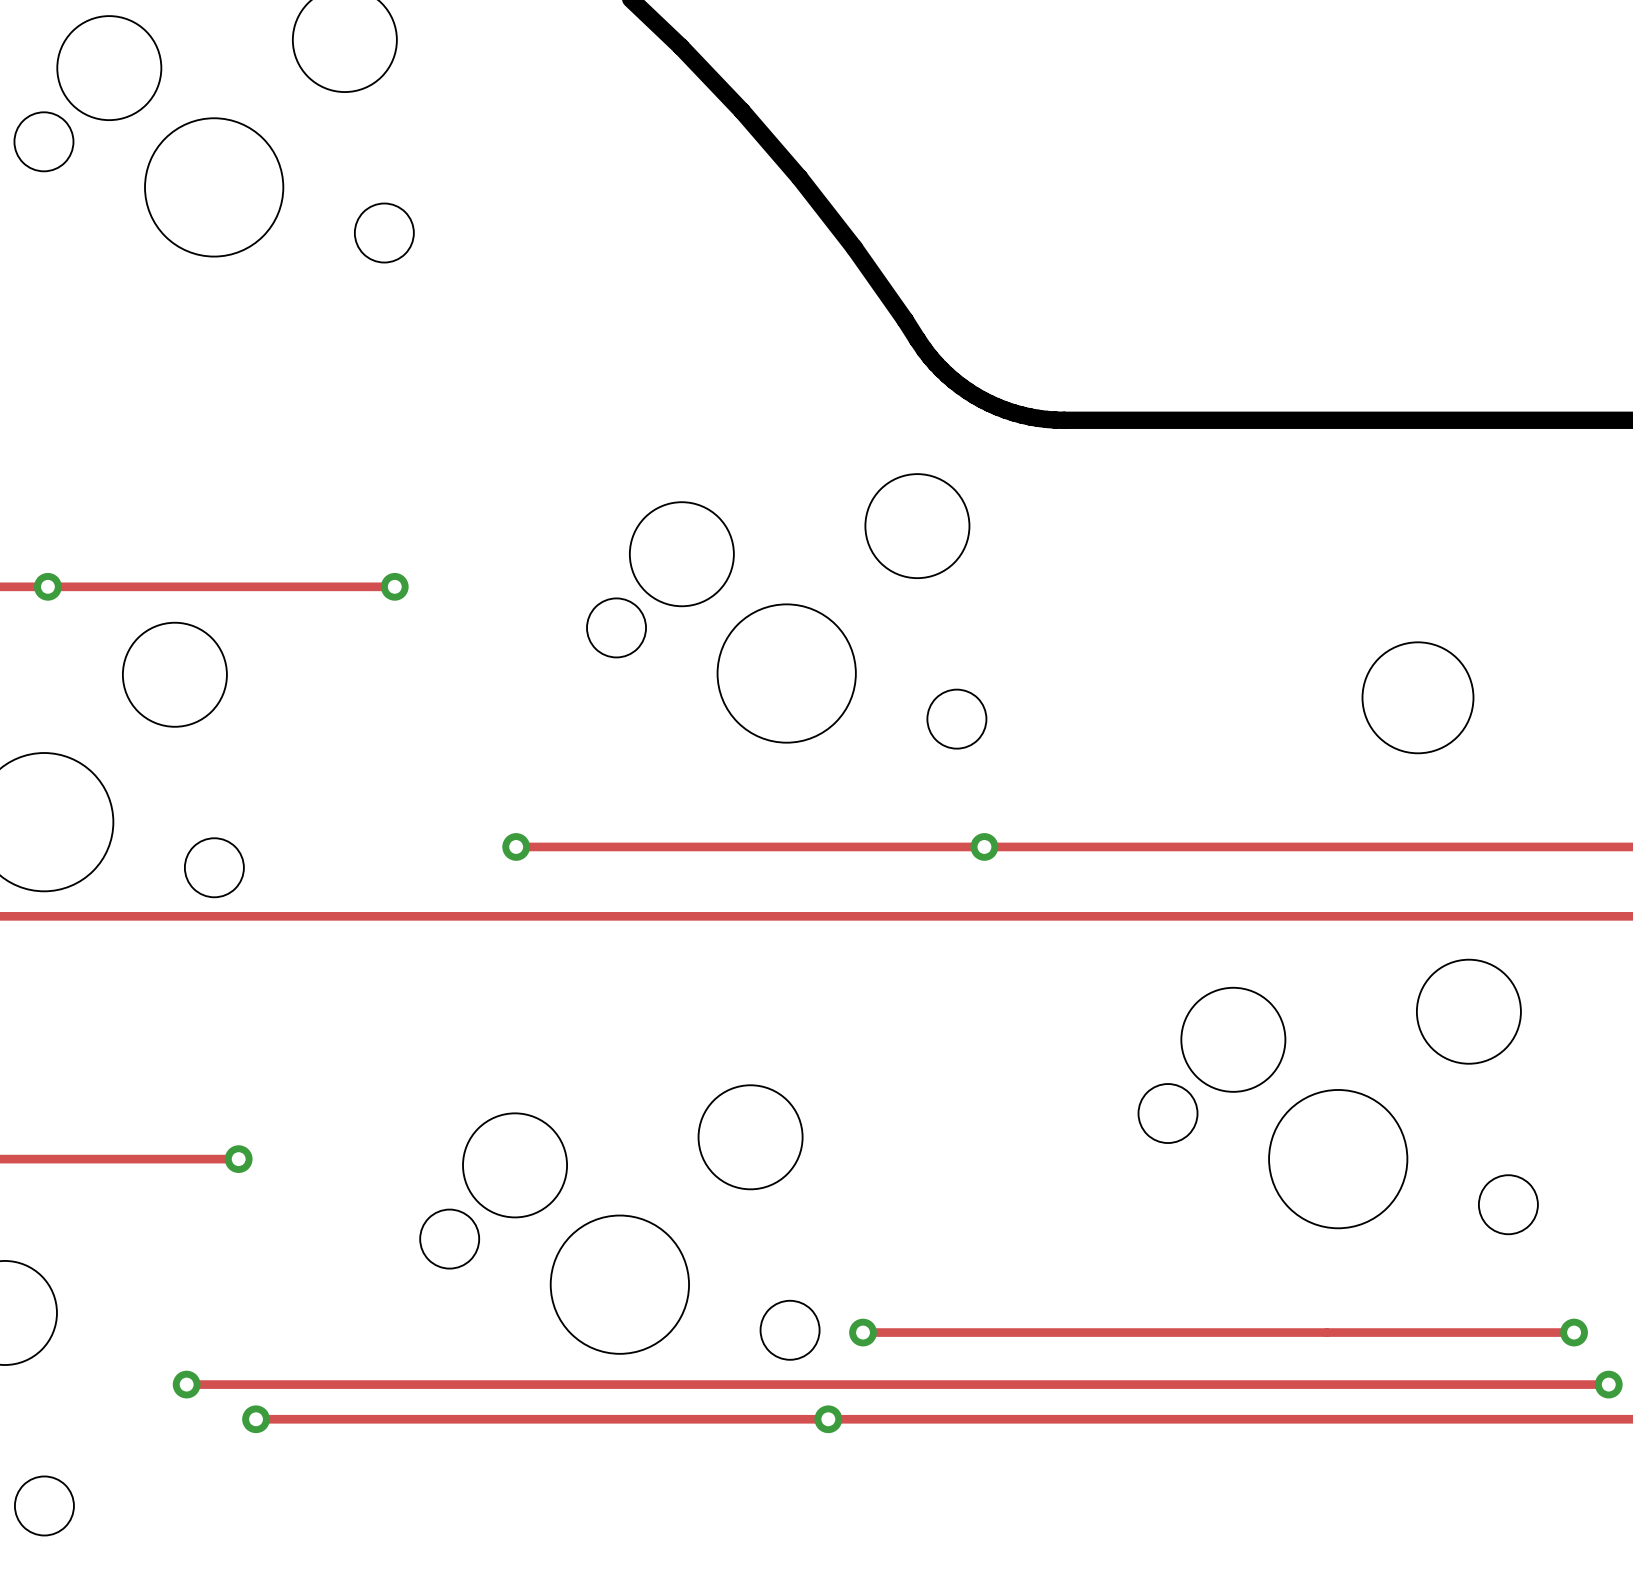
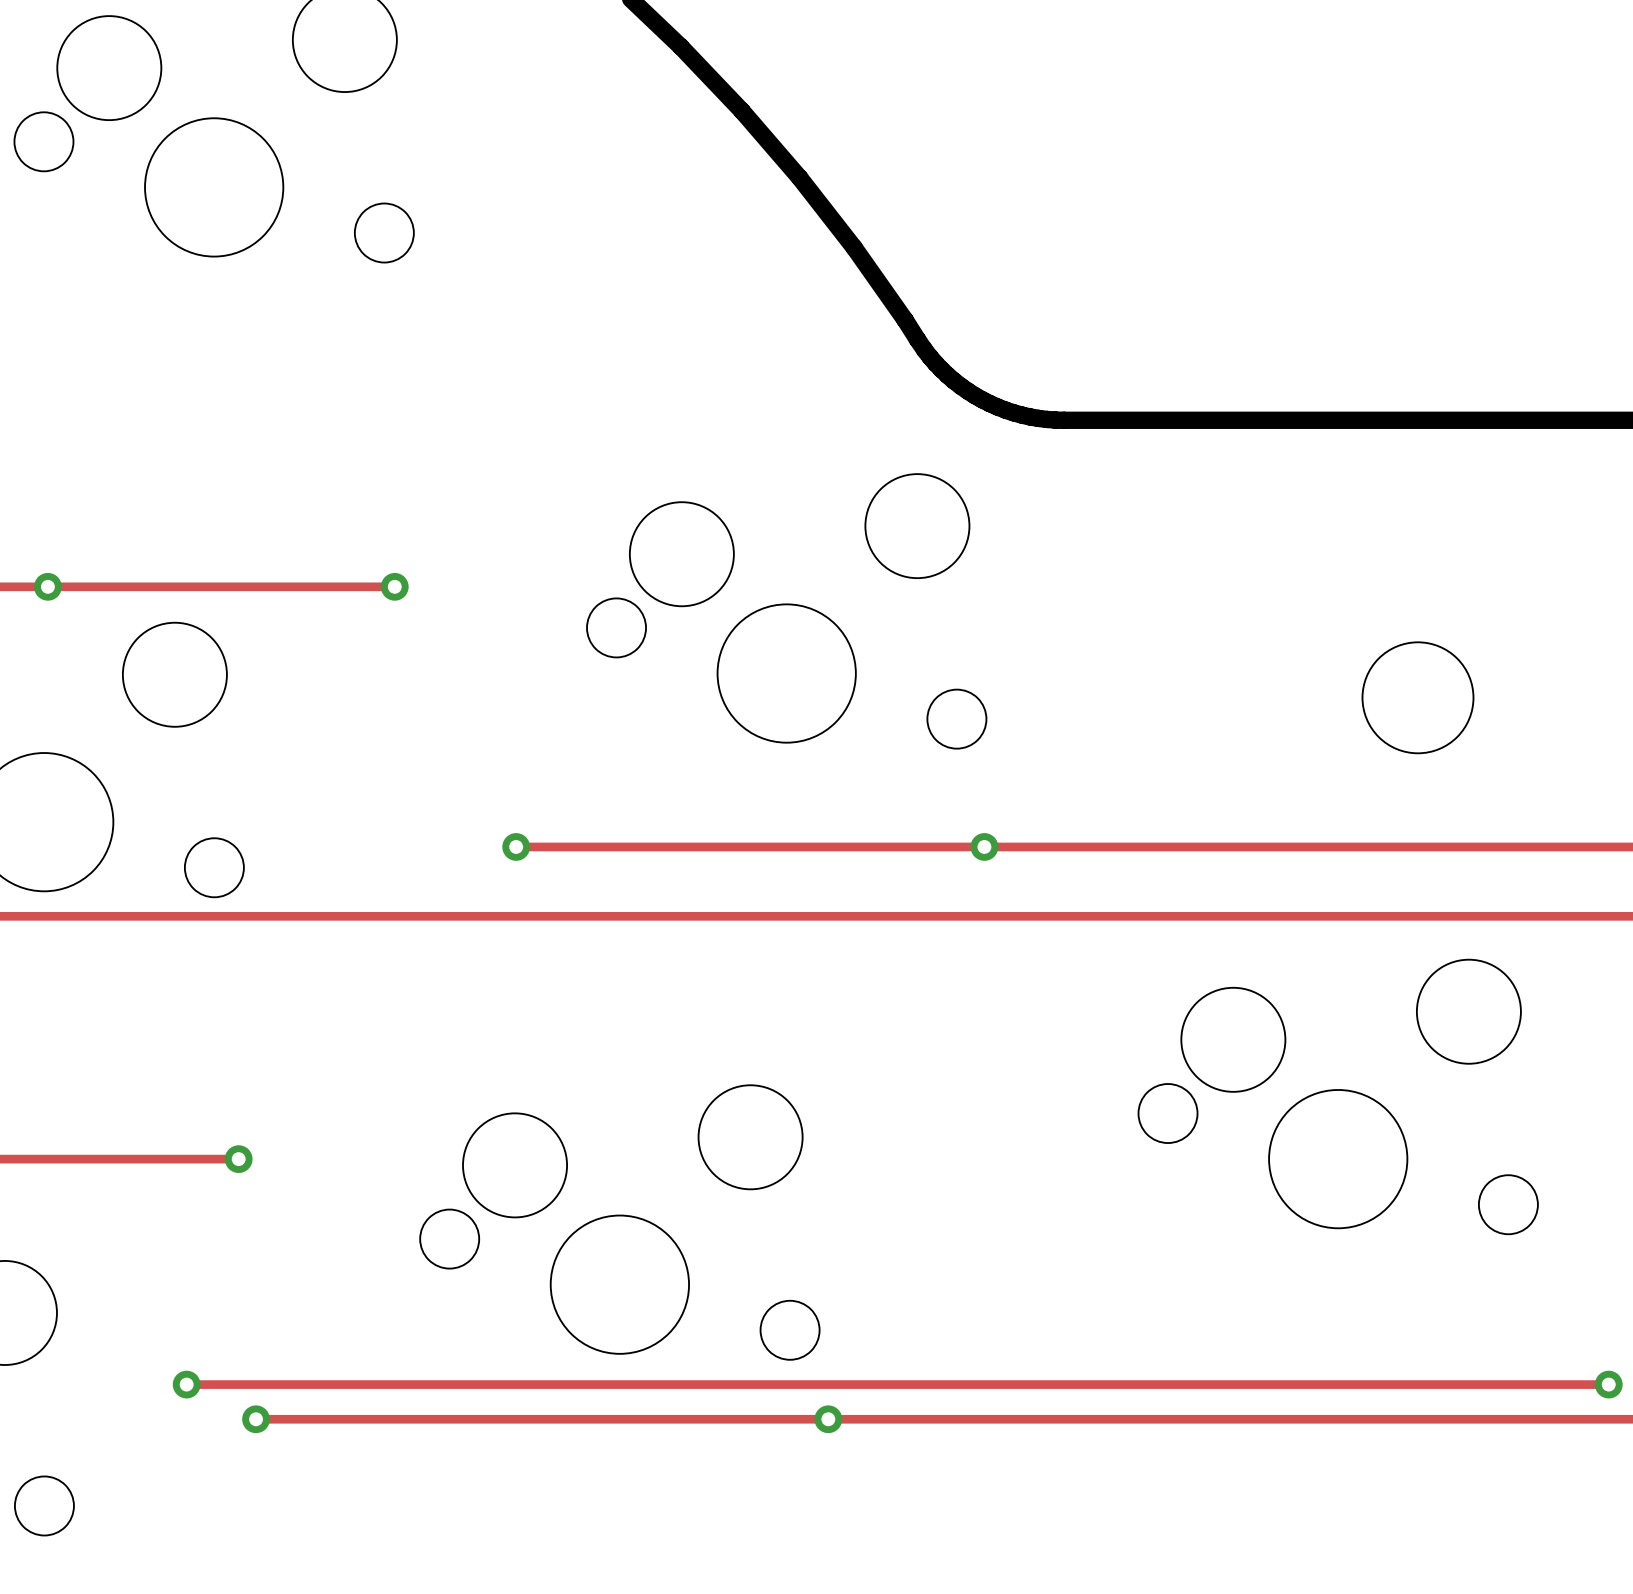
track: (863, 1332) (1574, 1332) -> none
via: (863, 1332) -> none
via: (1574, 1332) -> none

